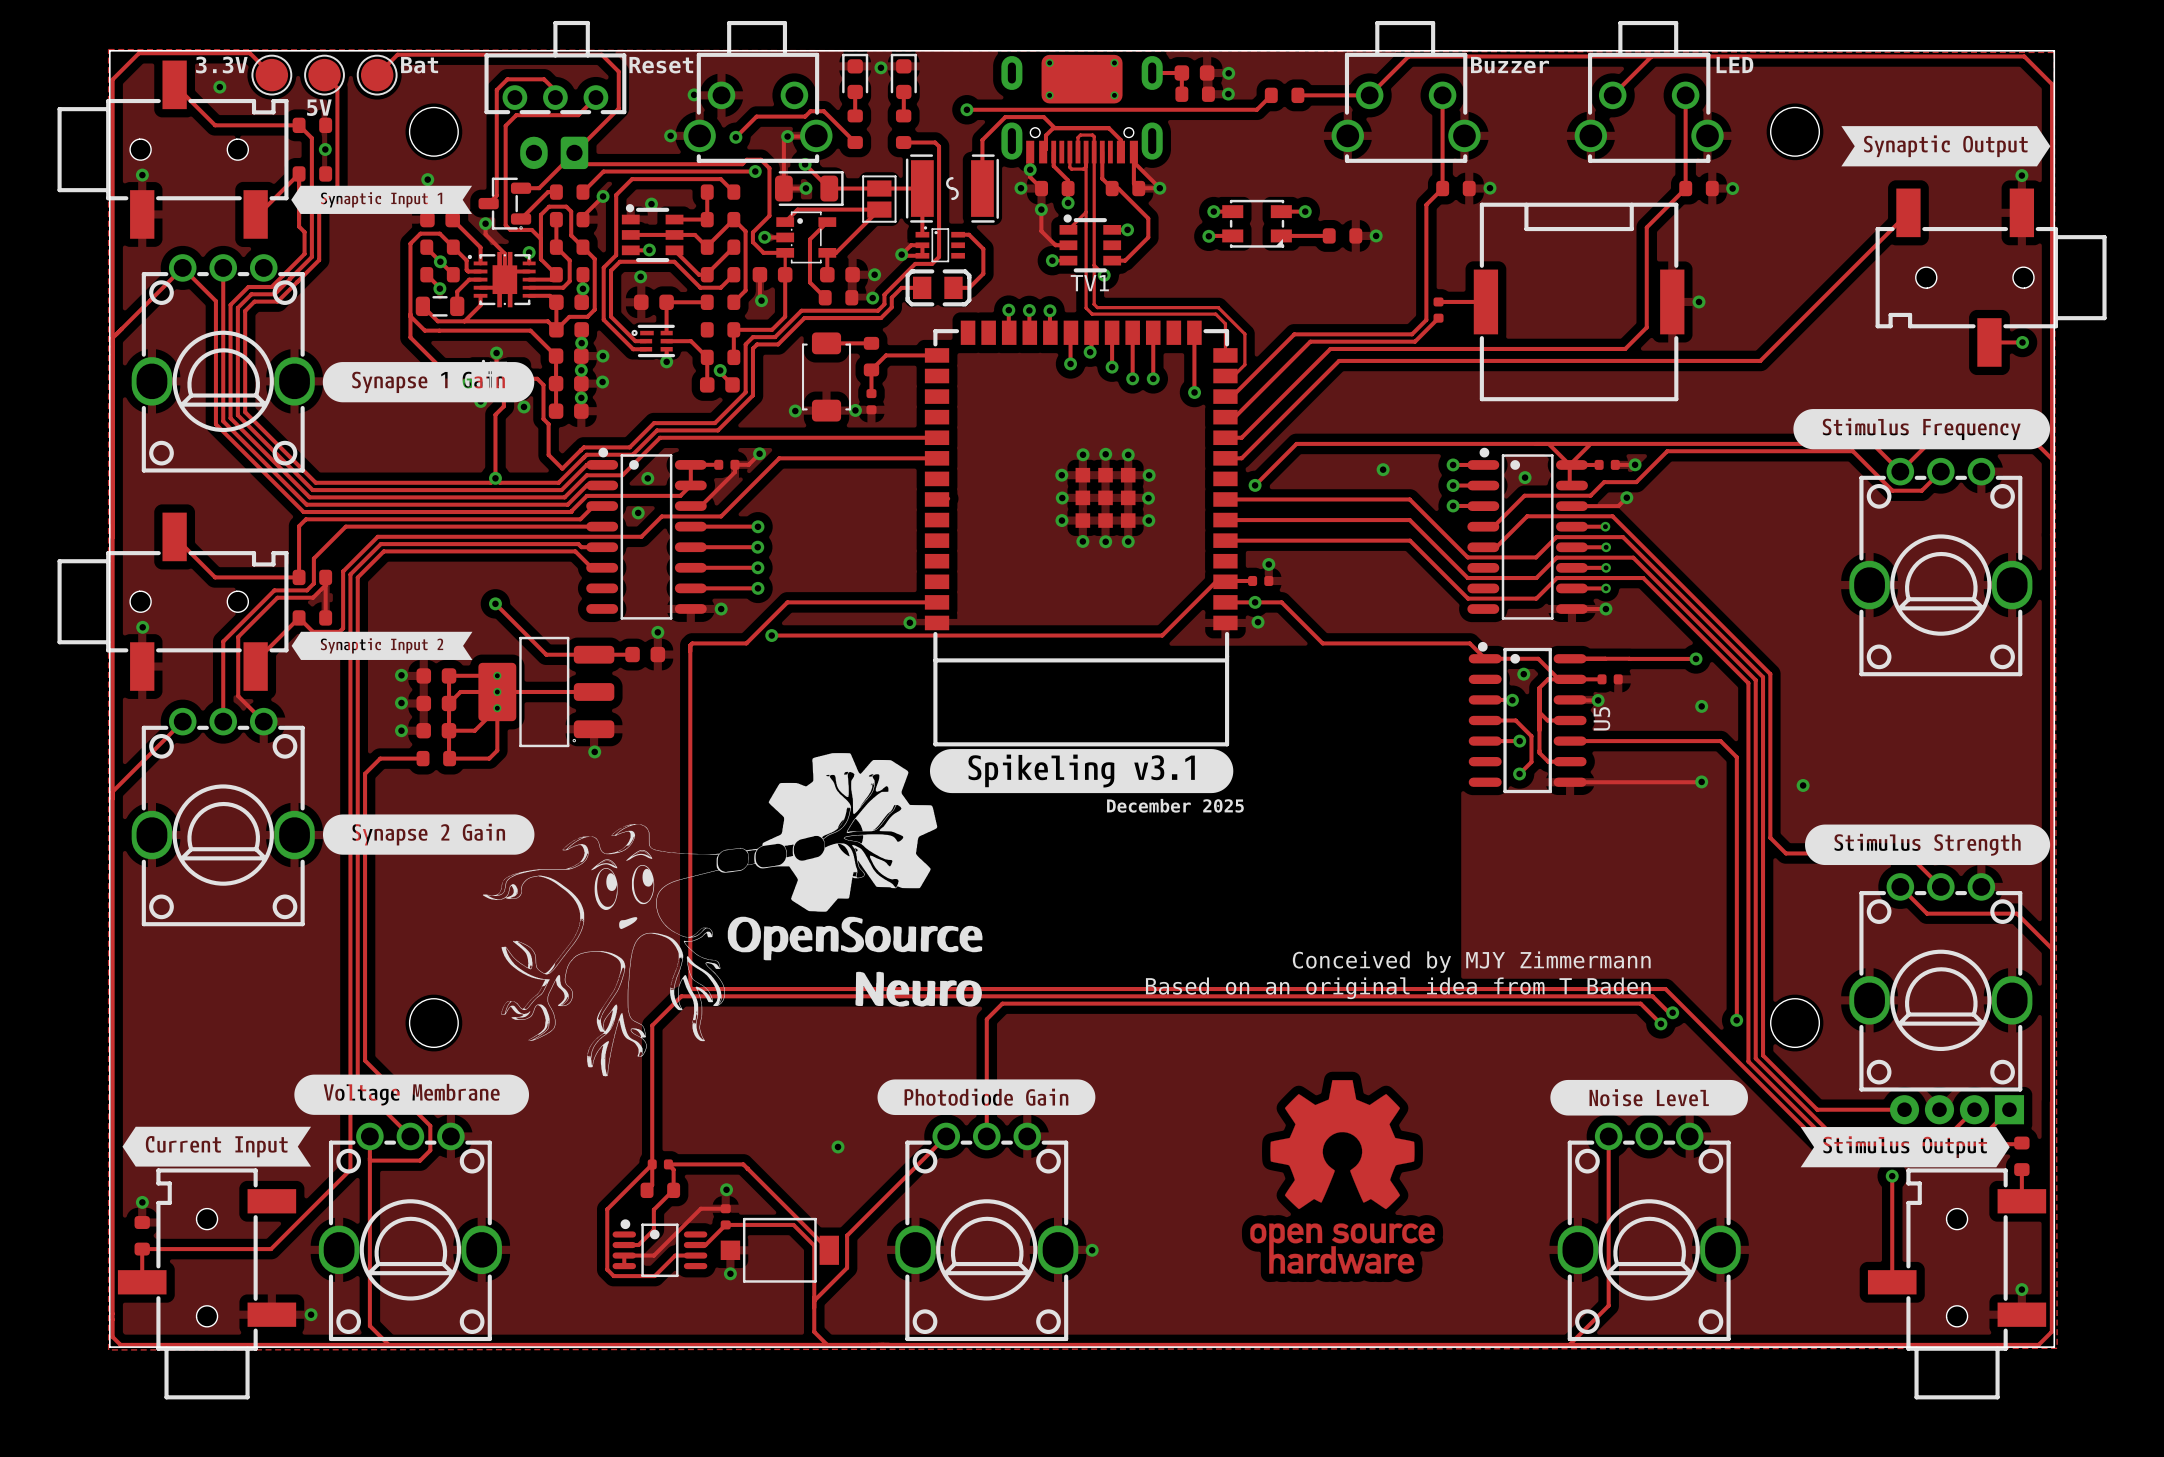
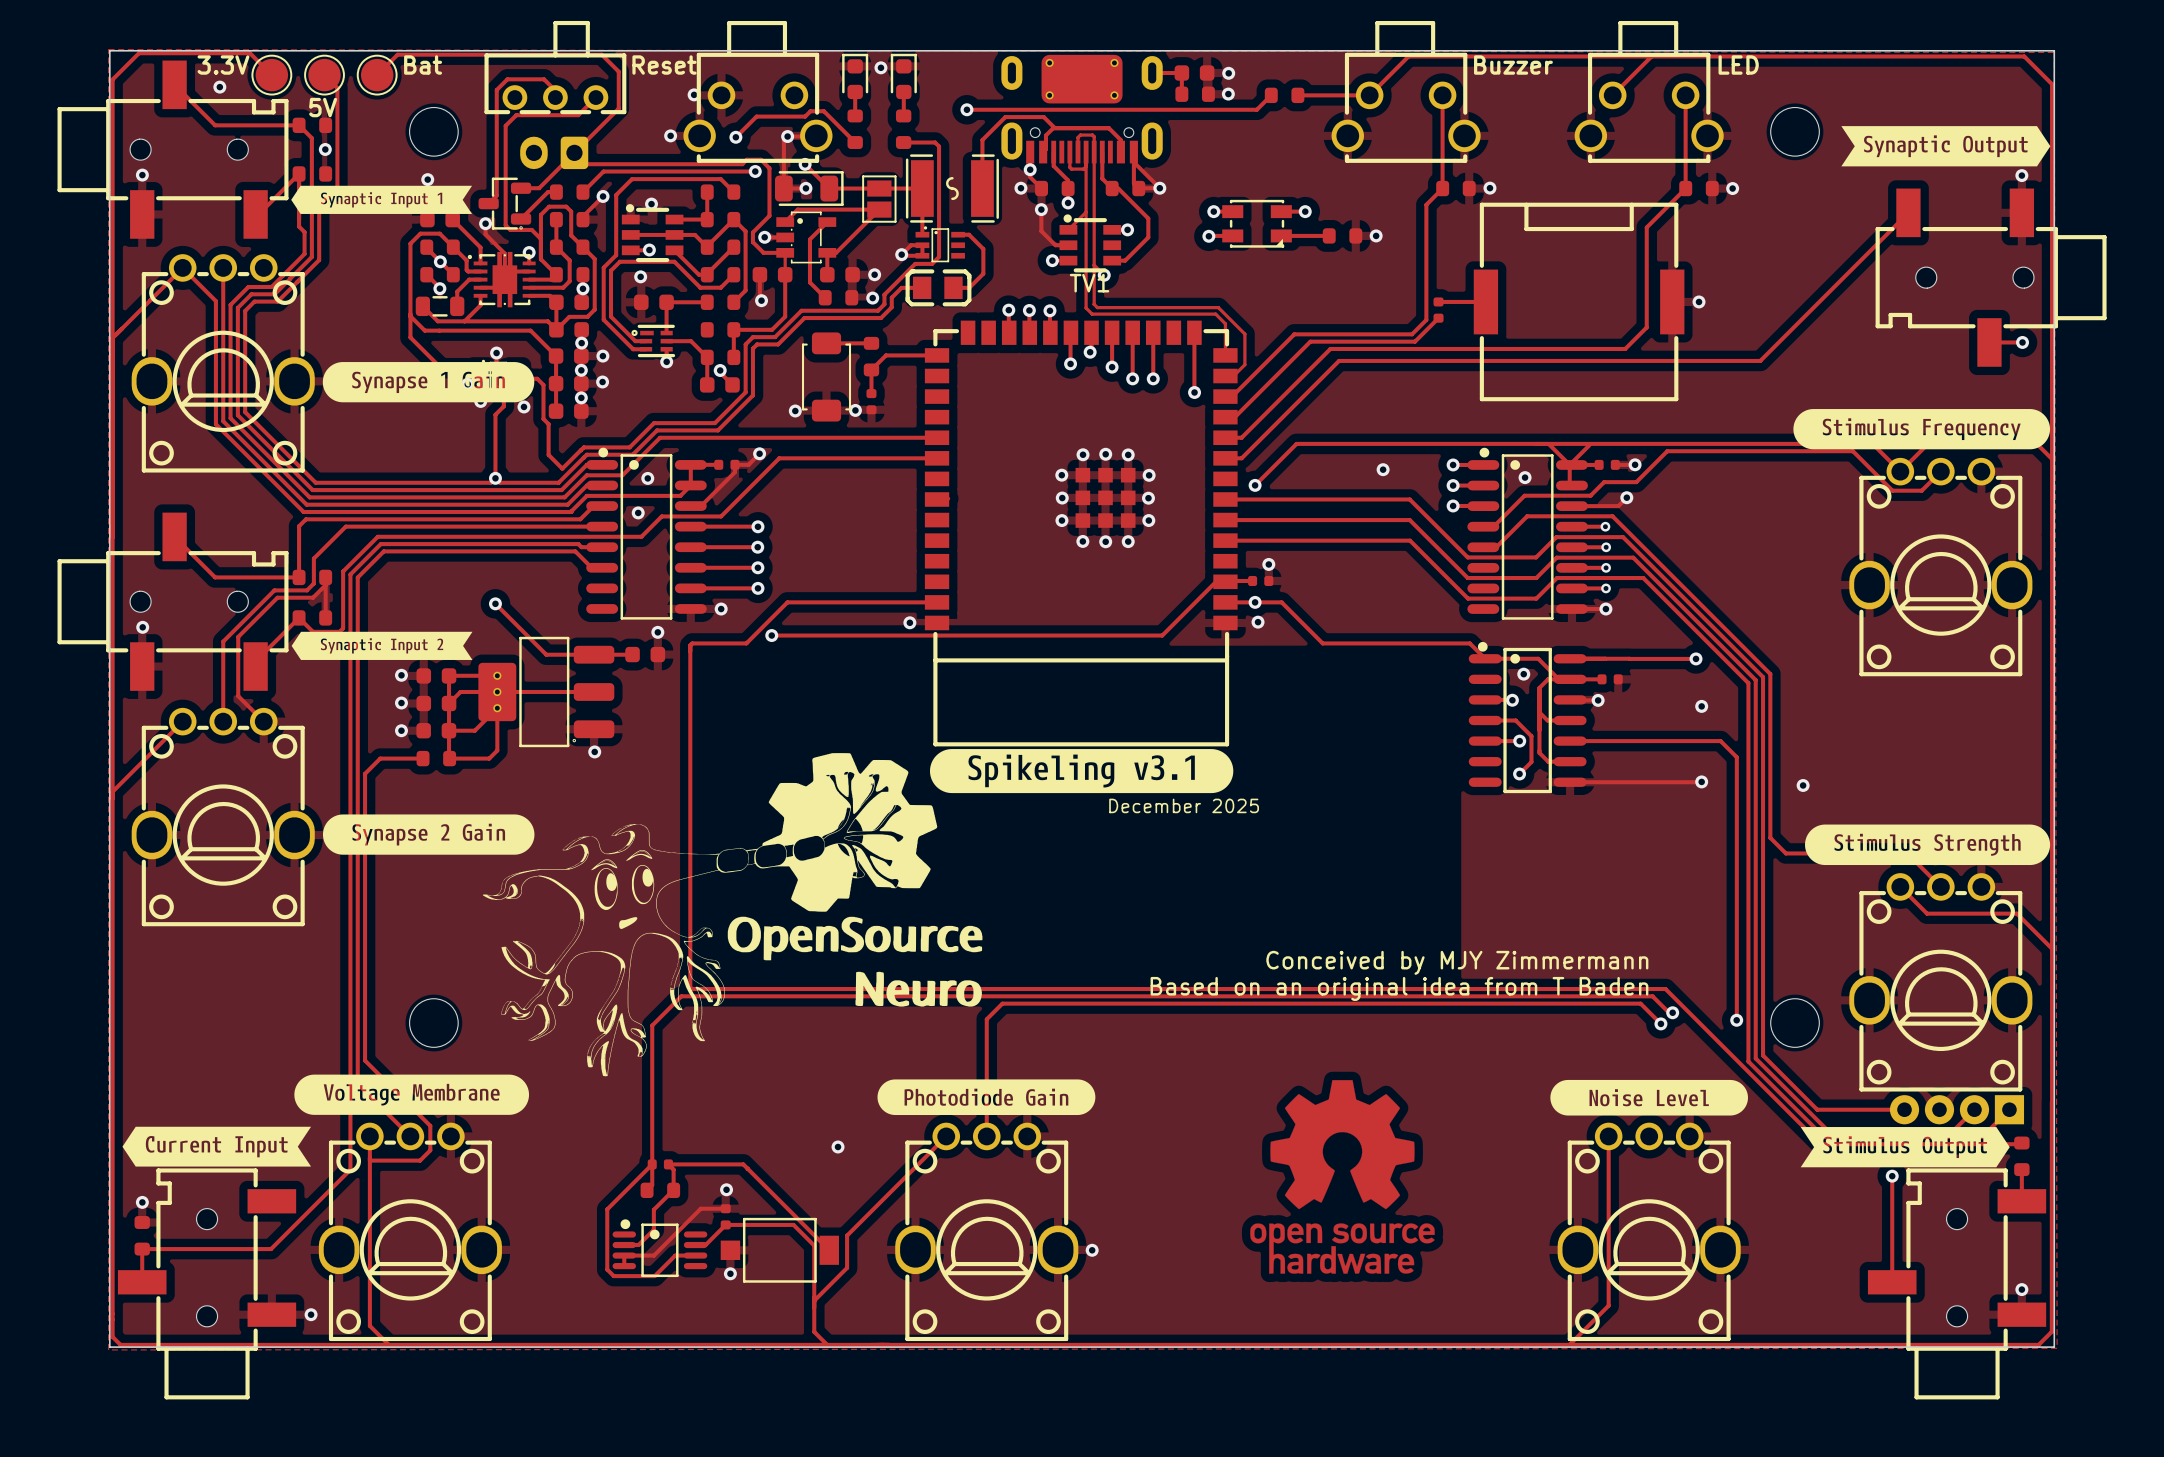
U5 name: U5 (1601, 718) -> none

